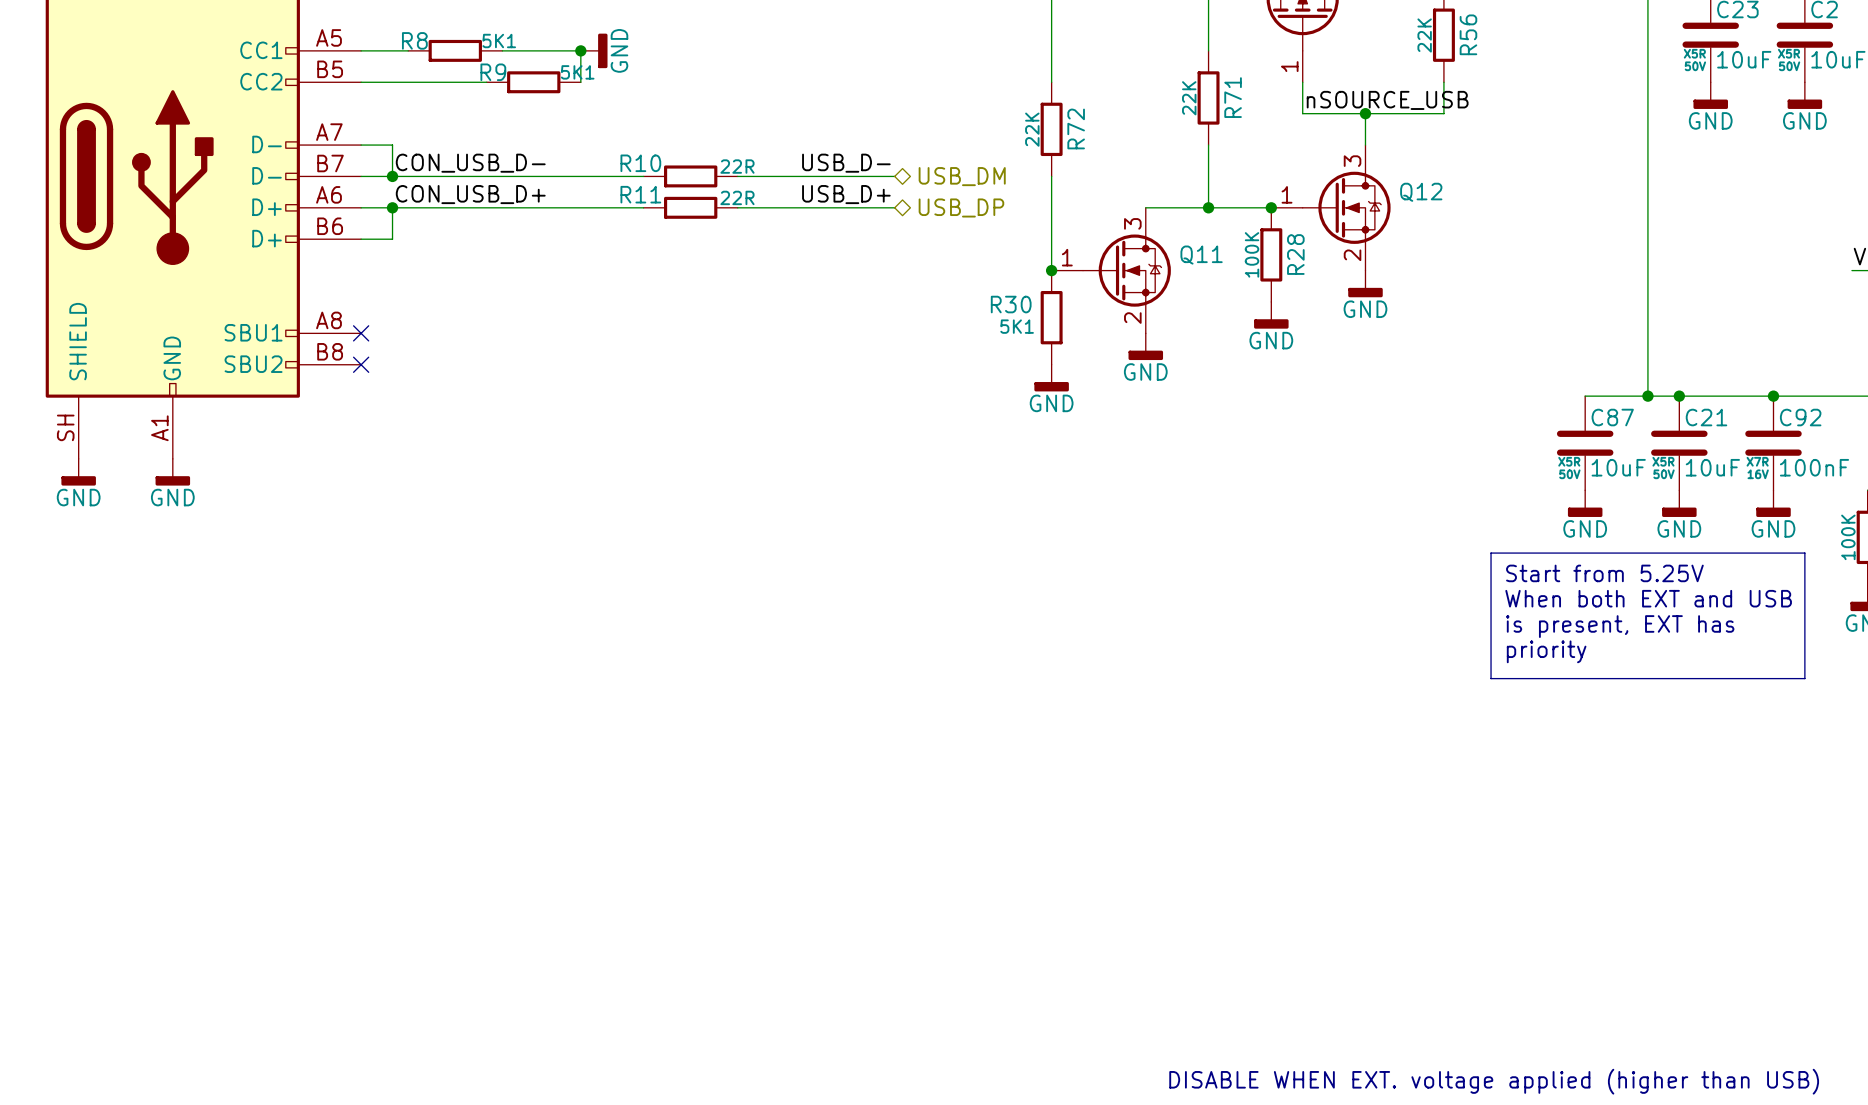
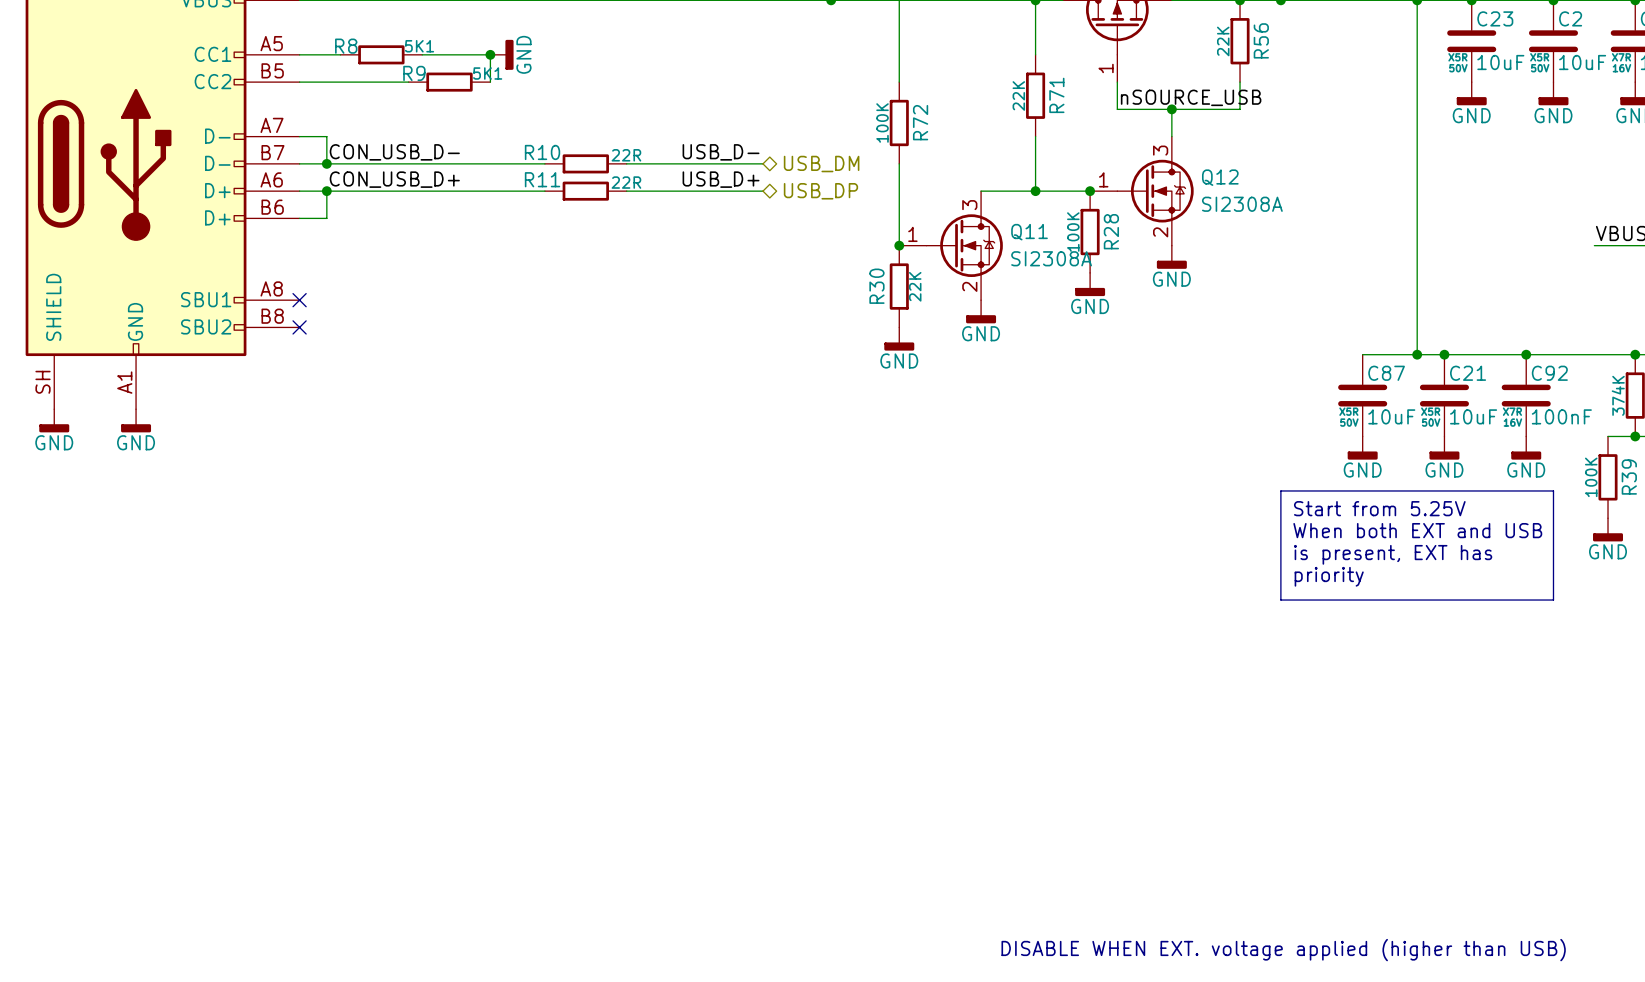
R72 value: 22K (1032, 129) -> 100K (882, 122)
Q12 value: none -> SI2308A (1242, 204)
Q11 value: none -> SI2308A (1051, 258)
R30 name rotation: 0° (1011, 304) -> 90° counterclockwise (876, 286)
R30 value: 5K1 (1017, 326) -> 22K (915, 286)

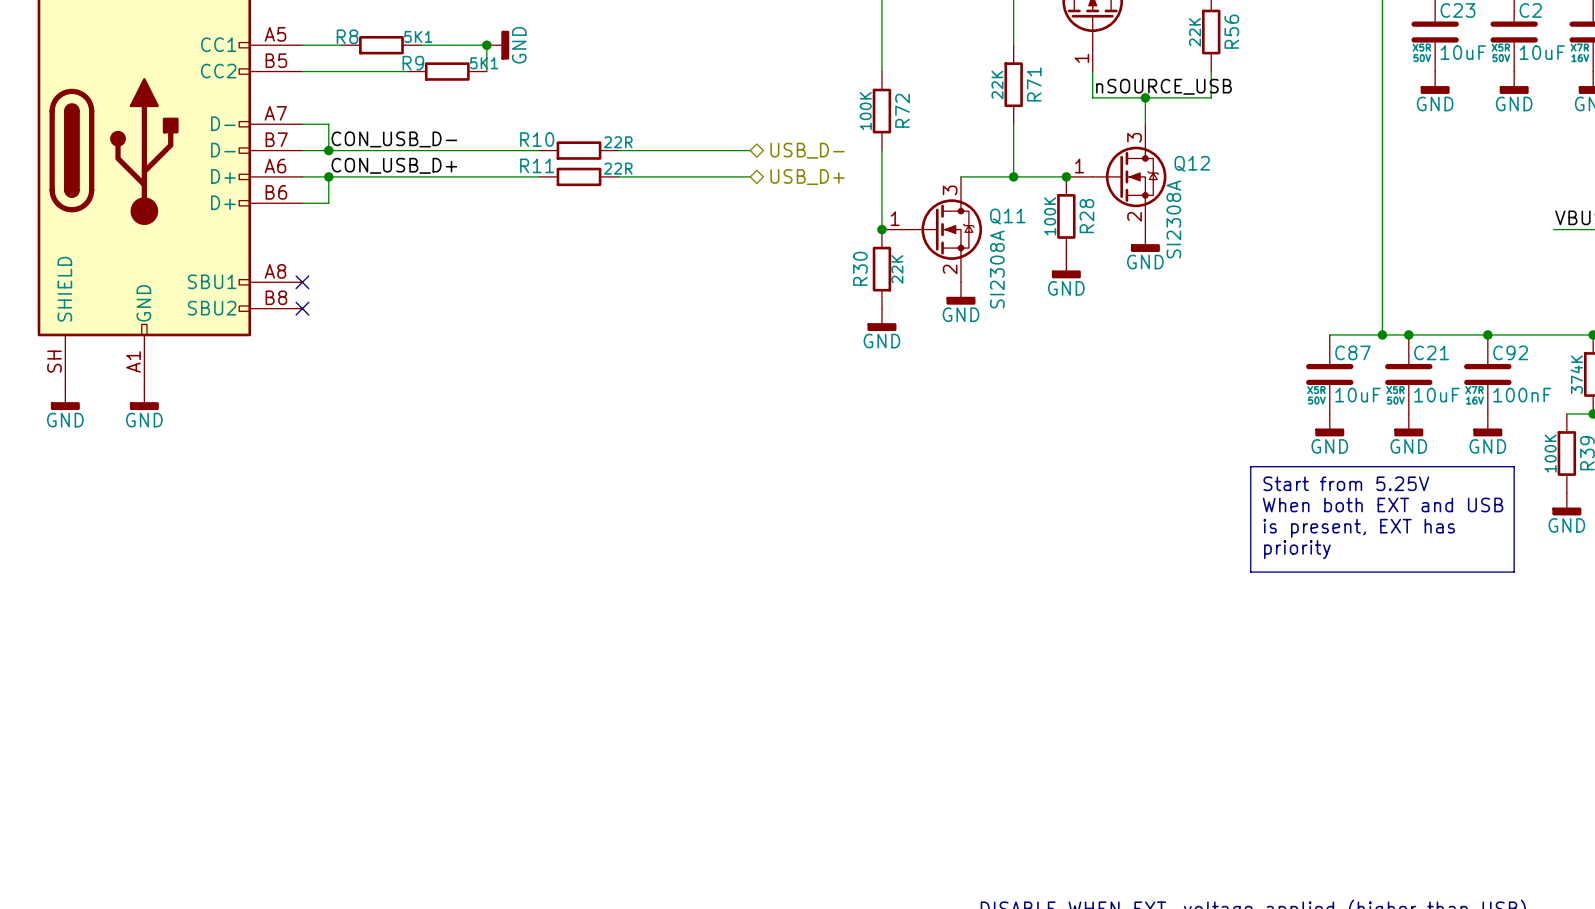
label: USB_D- (721, 152) -> none
hierarchical label: USB_DM (821, 164) -> USB_D- (807, 150)
label: USB_D+ (721, 179) -> none
hierarchical label: USB_DP (820, 191) -> USB_D+ (807, 177)
Q12 value rotation: 0° (1242, 204) -> 90° counterclockwise (1173, 219)
Q11 value rotation: 0° (1051, 258) -> 90° counterclockwise (997, 269)

